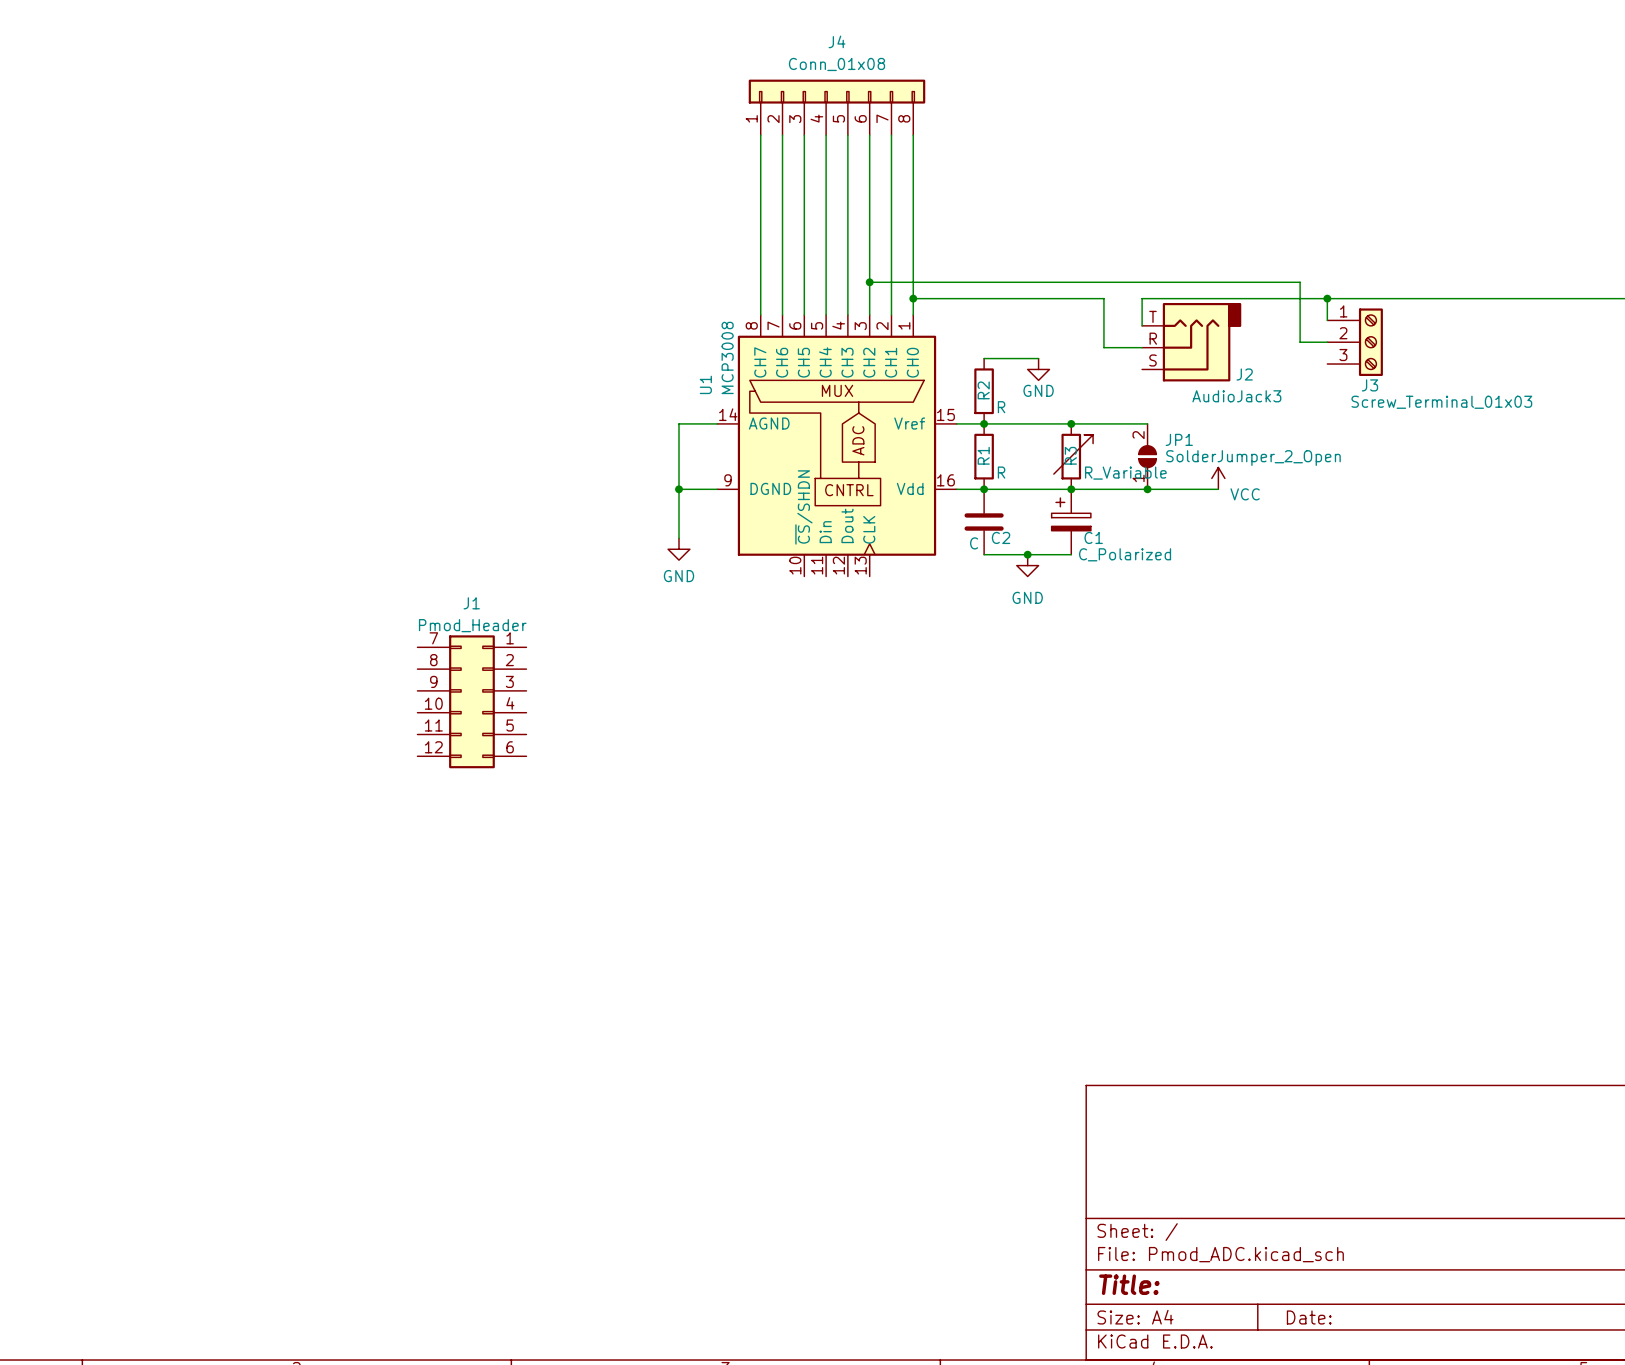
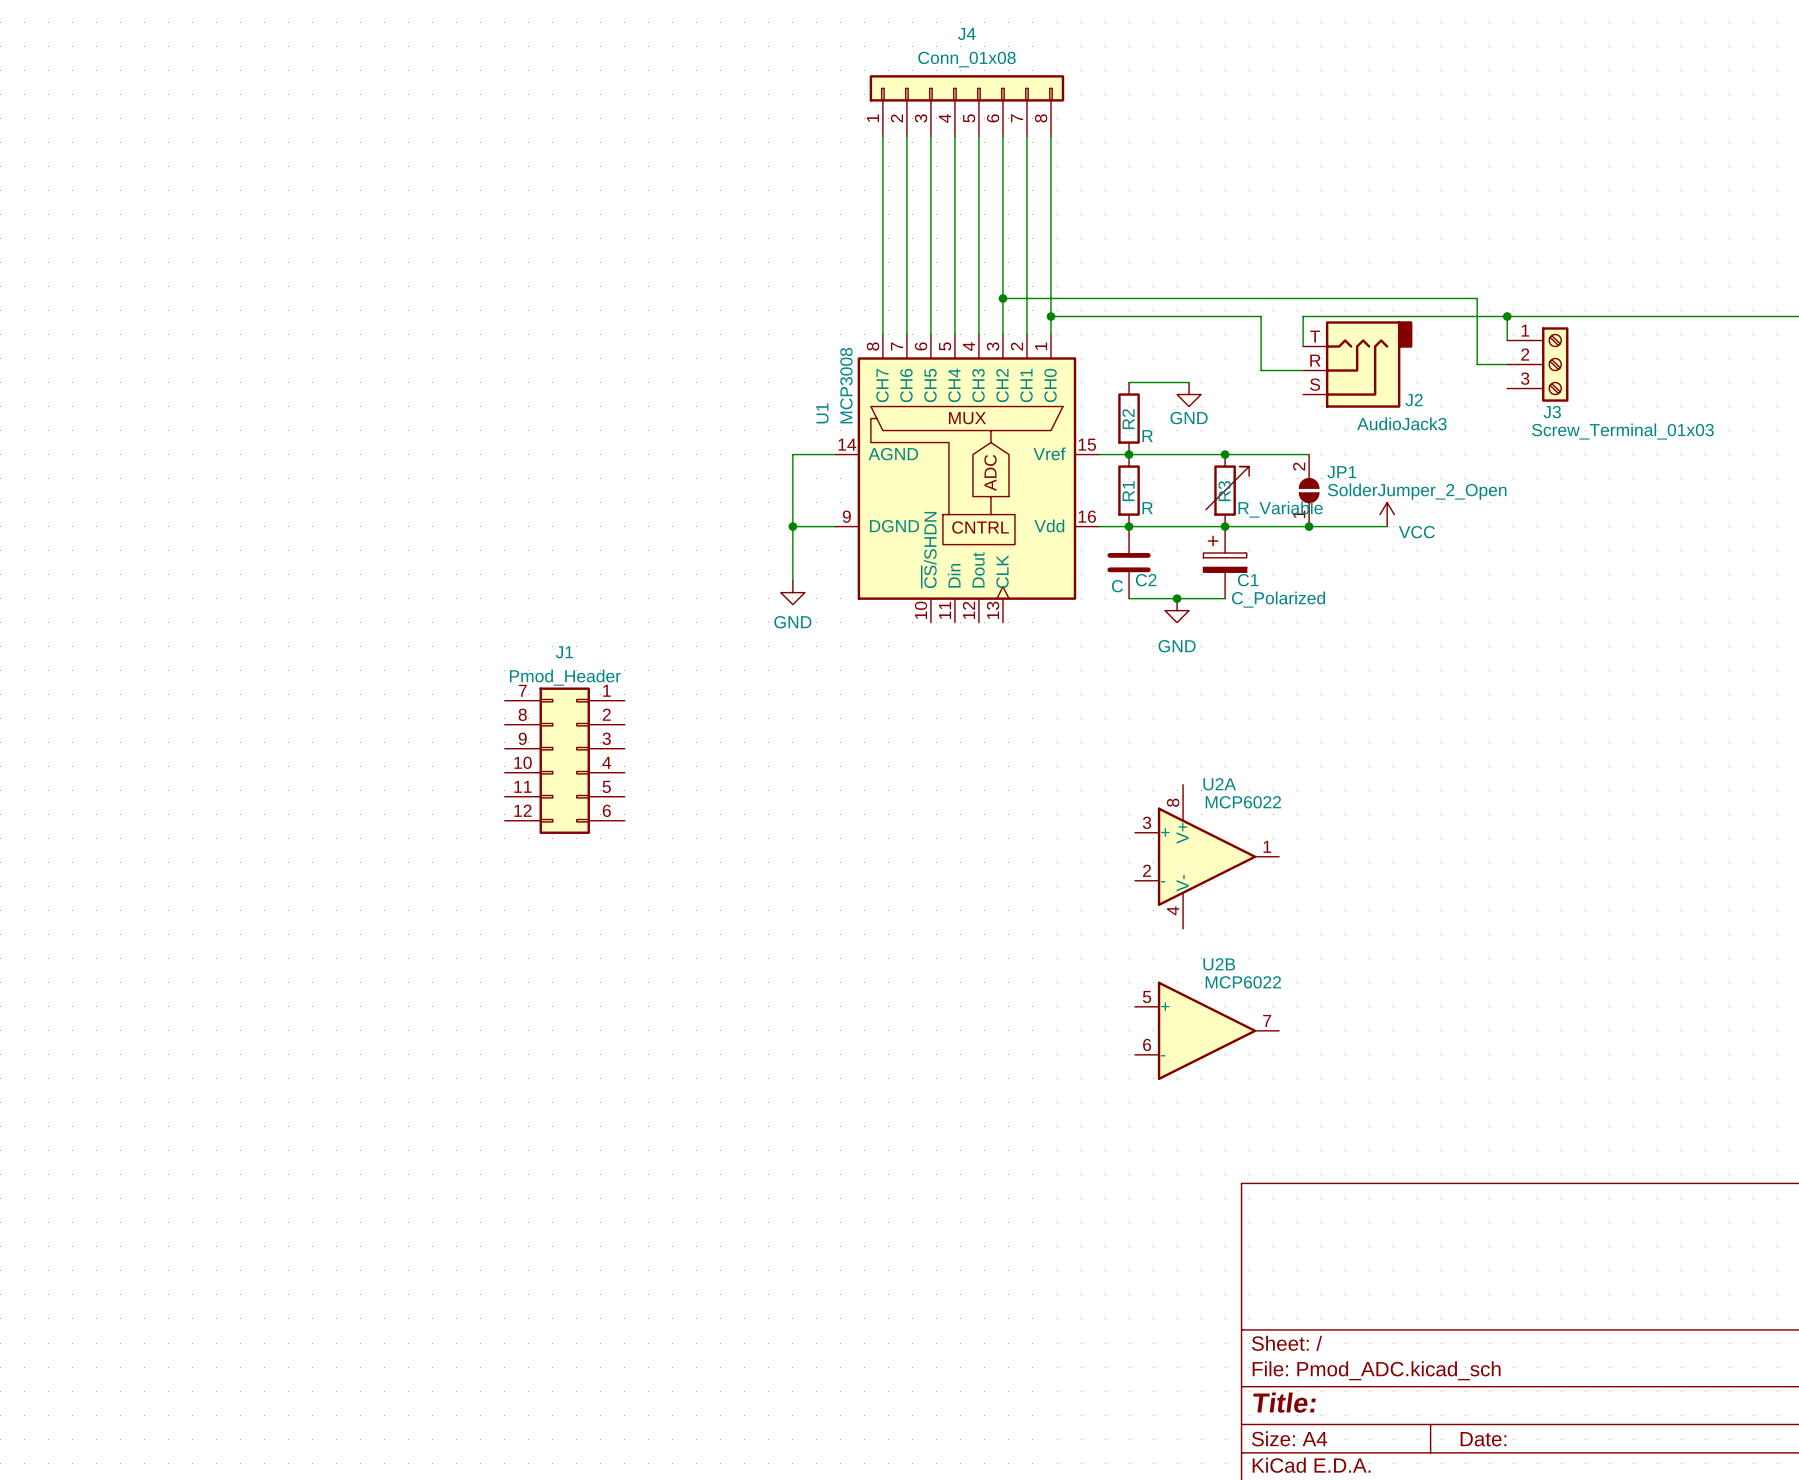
part: none -> (1183, 856)
U2A: none -> MCP6022 (1207, 856)
U2B: none -> MCP6022 (1207, 1030)

